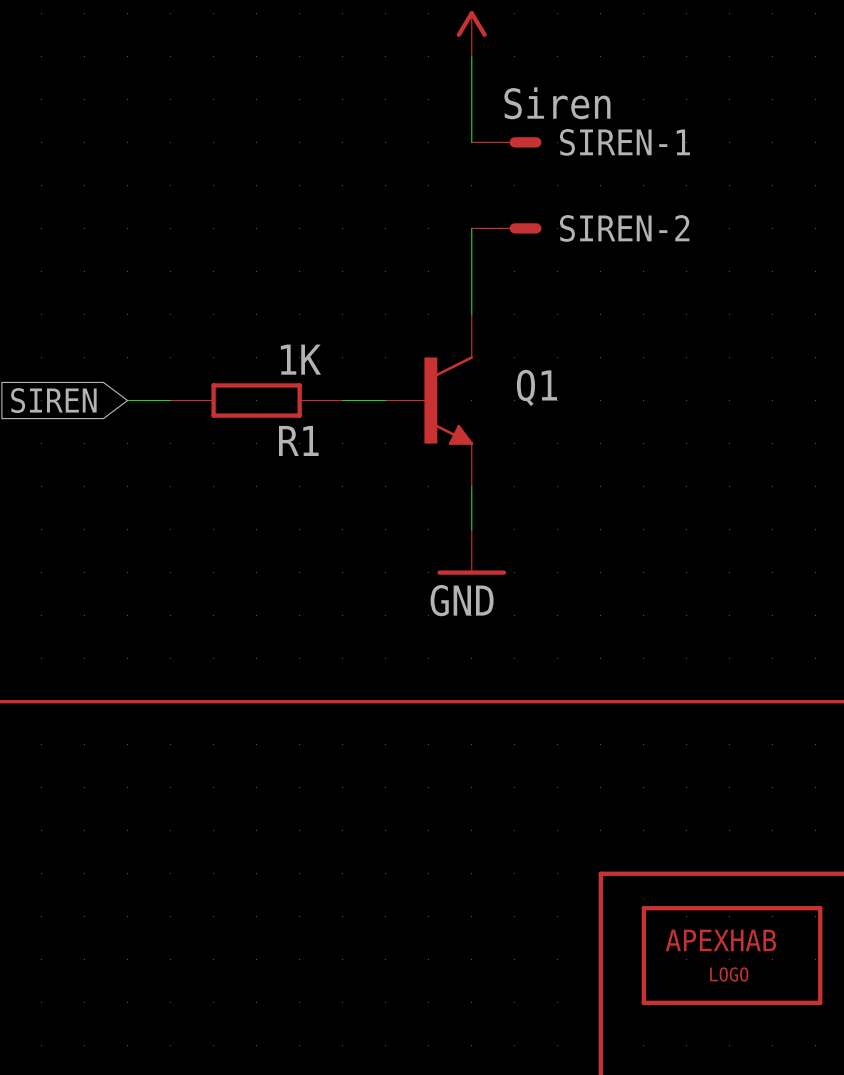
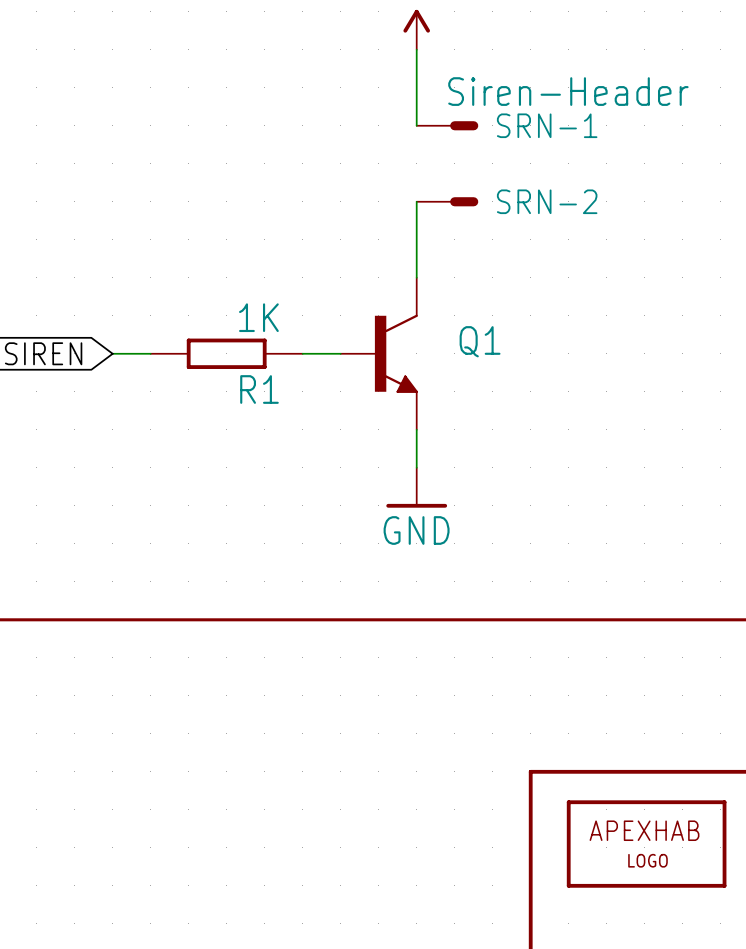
SIREN-1 value: Siren (557, 103) -> Siren-Header (568, 91)
SIREN-1 name: SIREN-1 (624, 142) -> SRN-1 (547, 125)
SIREN-2 name: SIREN-2 (624, 228) -> SRN-2 (547, 201)

